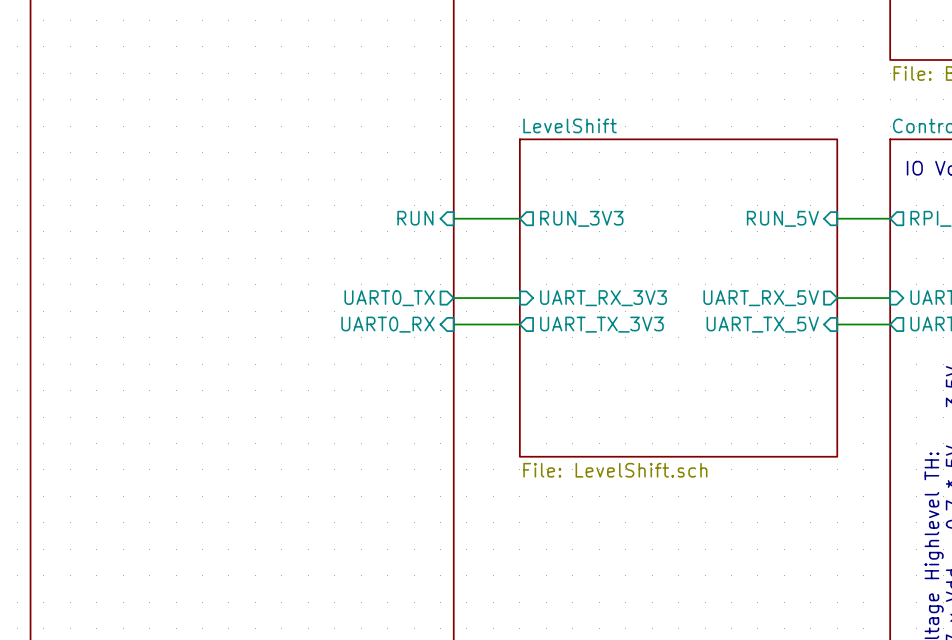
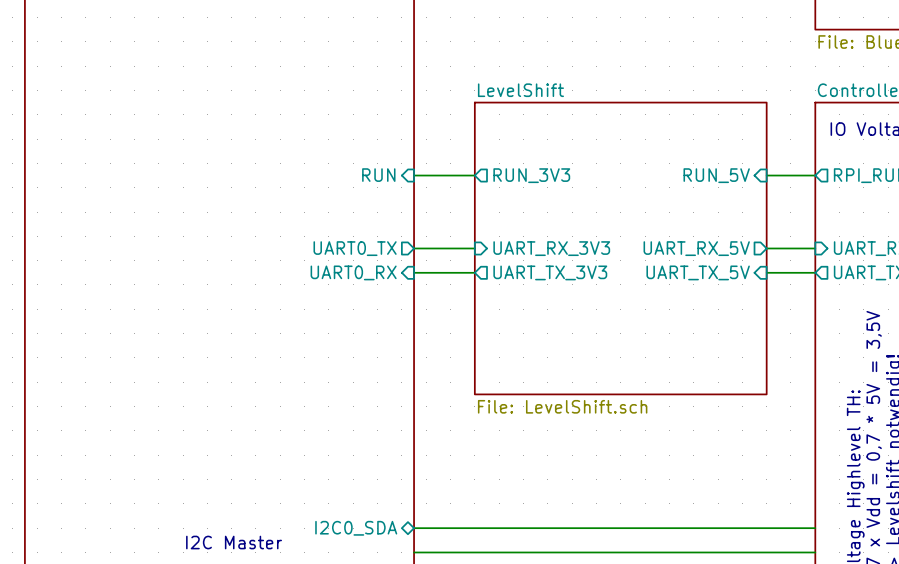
sheet pin: none -> I2C0_SDA (356, 528)
wire: none -> (414, 528) (815, 528)
text: none -> I2C Master (234, 542)
wire: none -> (414, 552) (815, 552)

